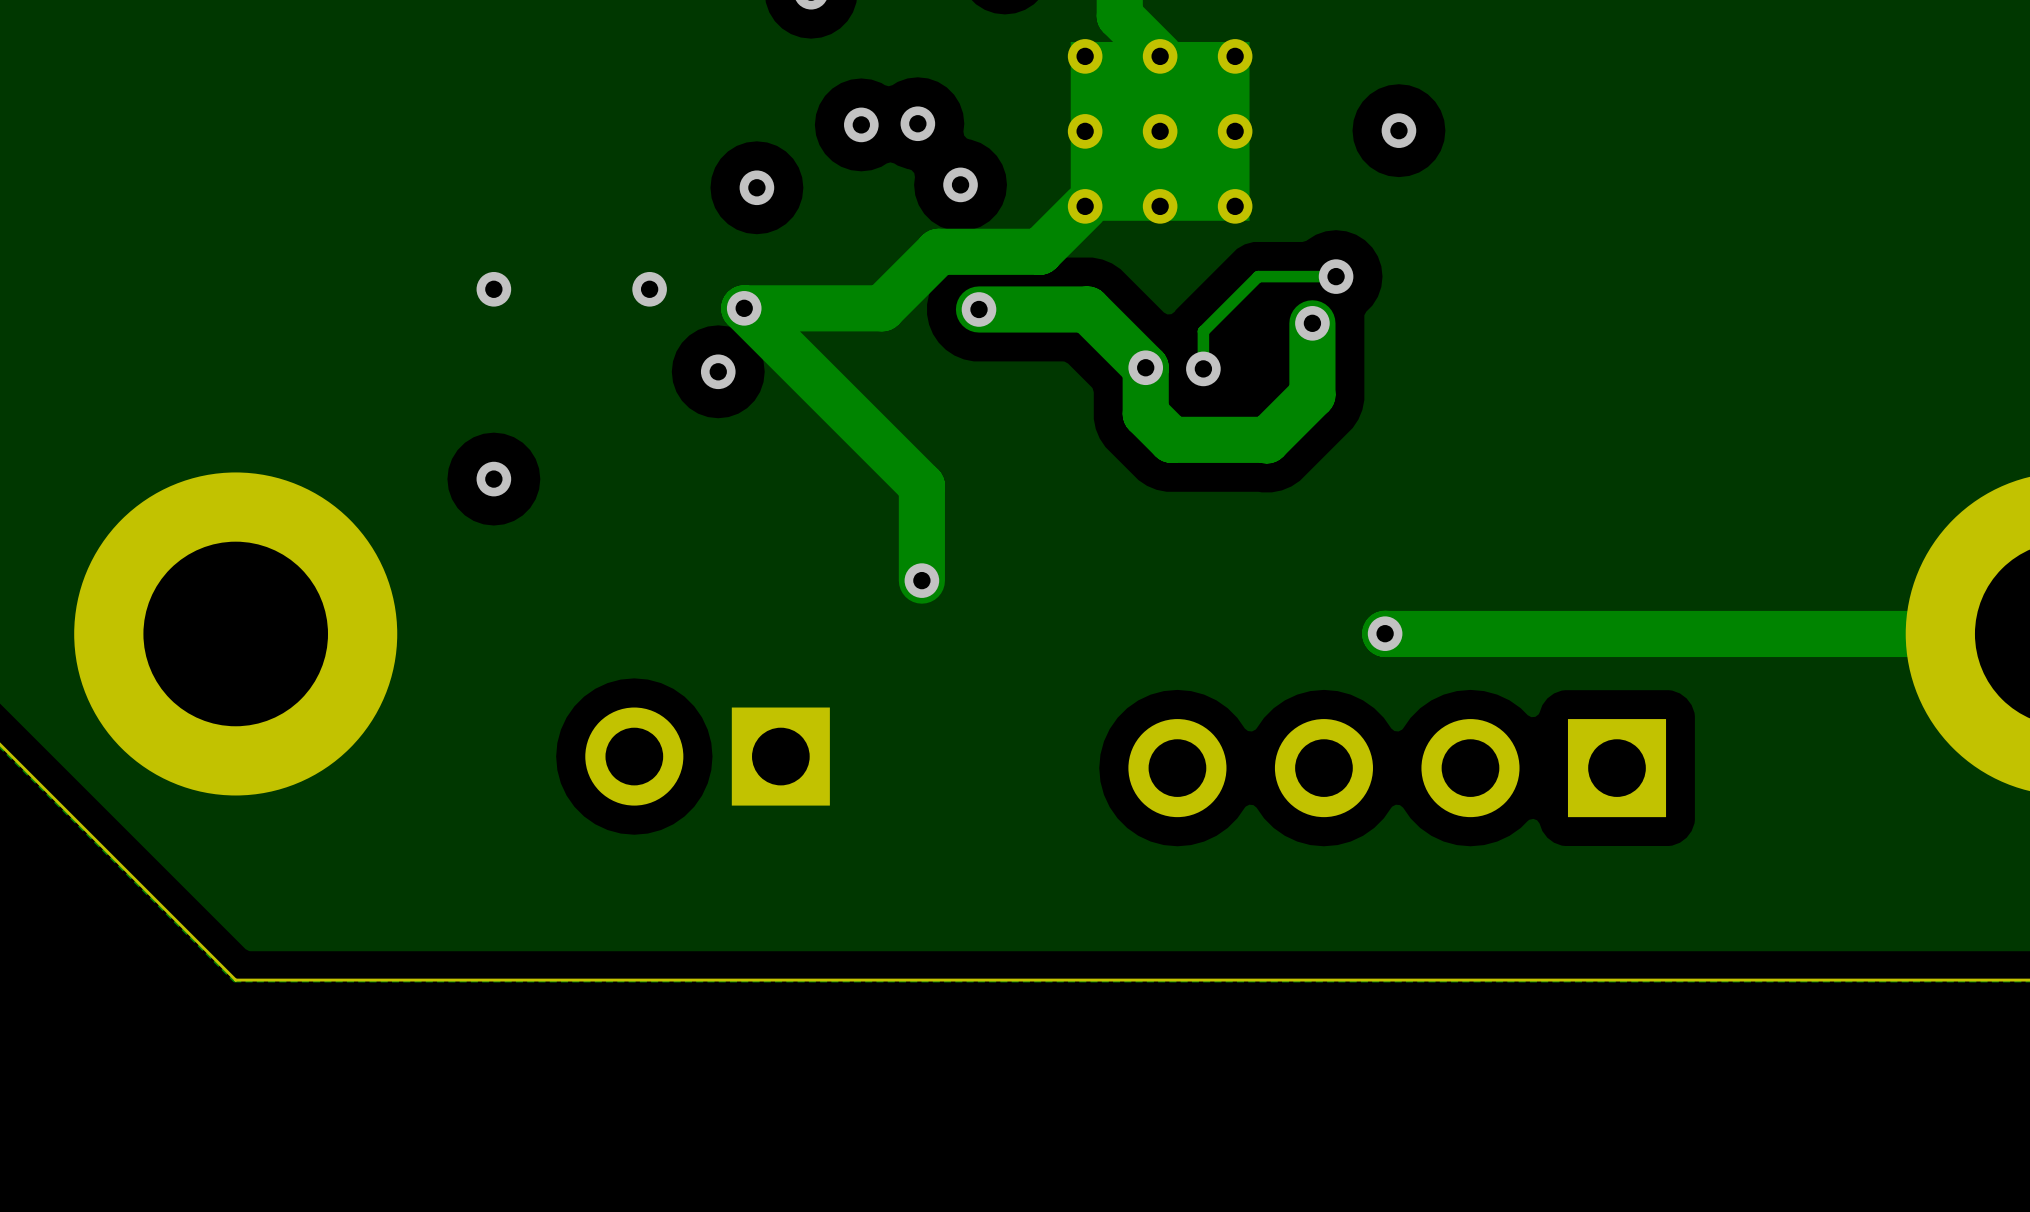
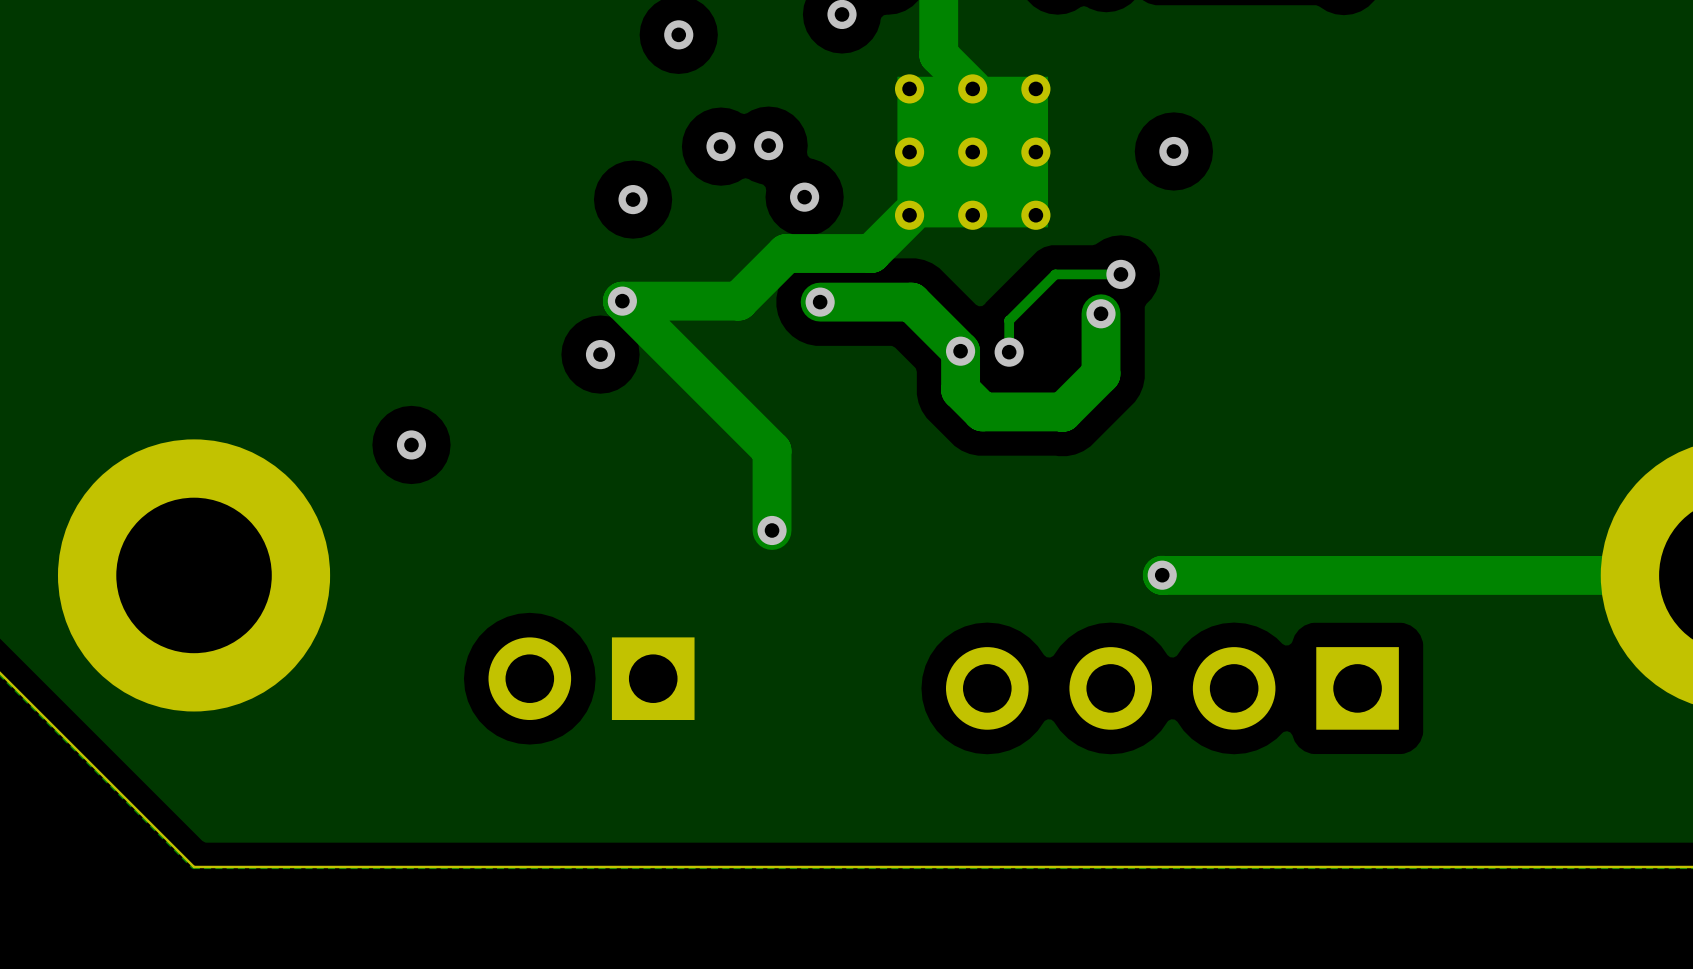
via: (493, 289) -> none
via: (649, 289) -> none

